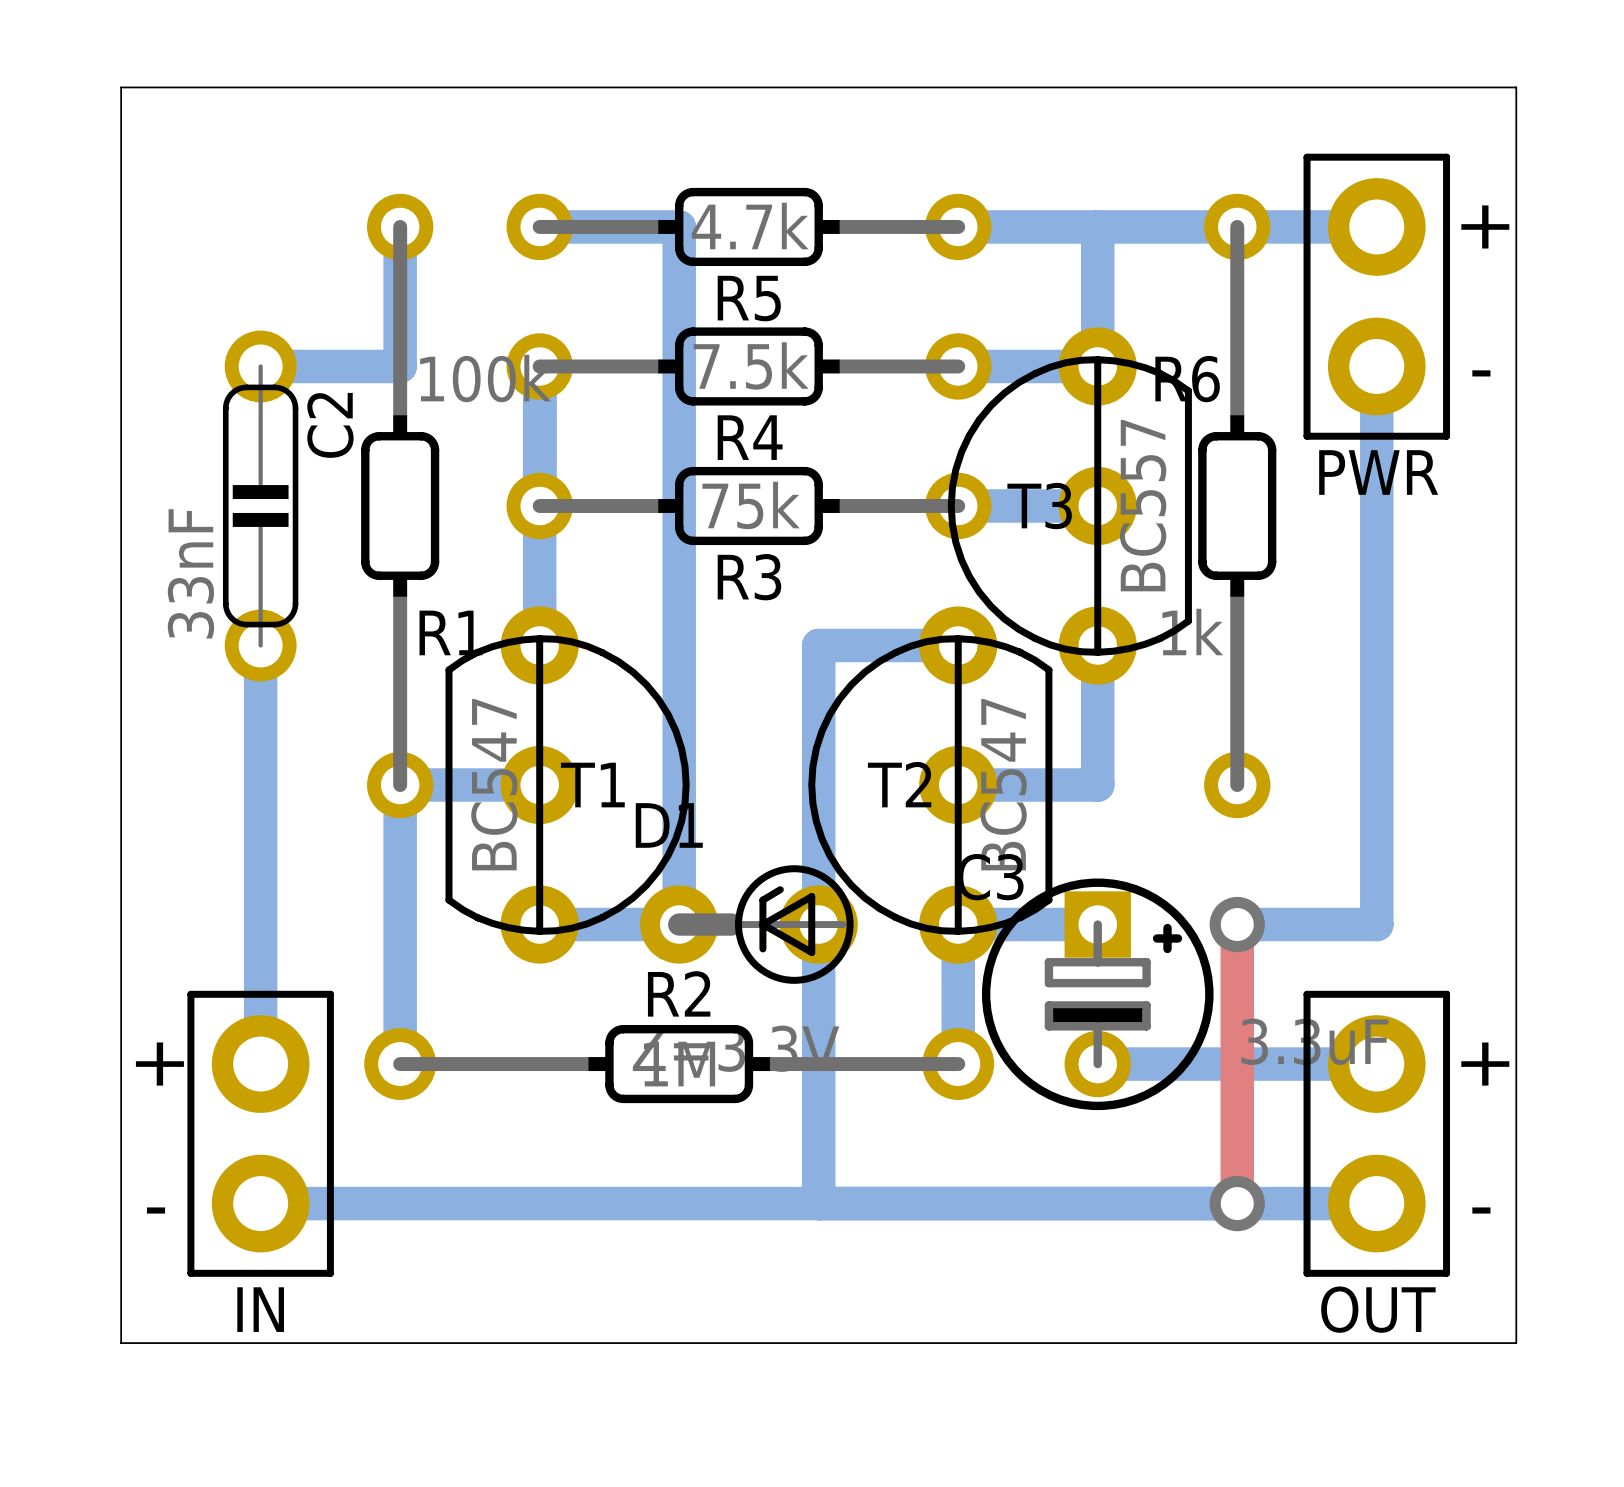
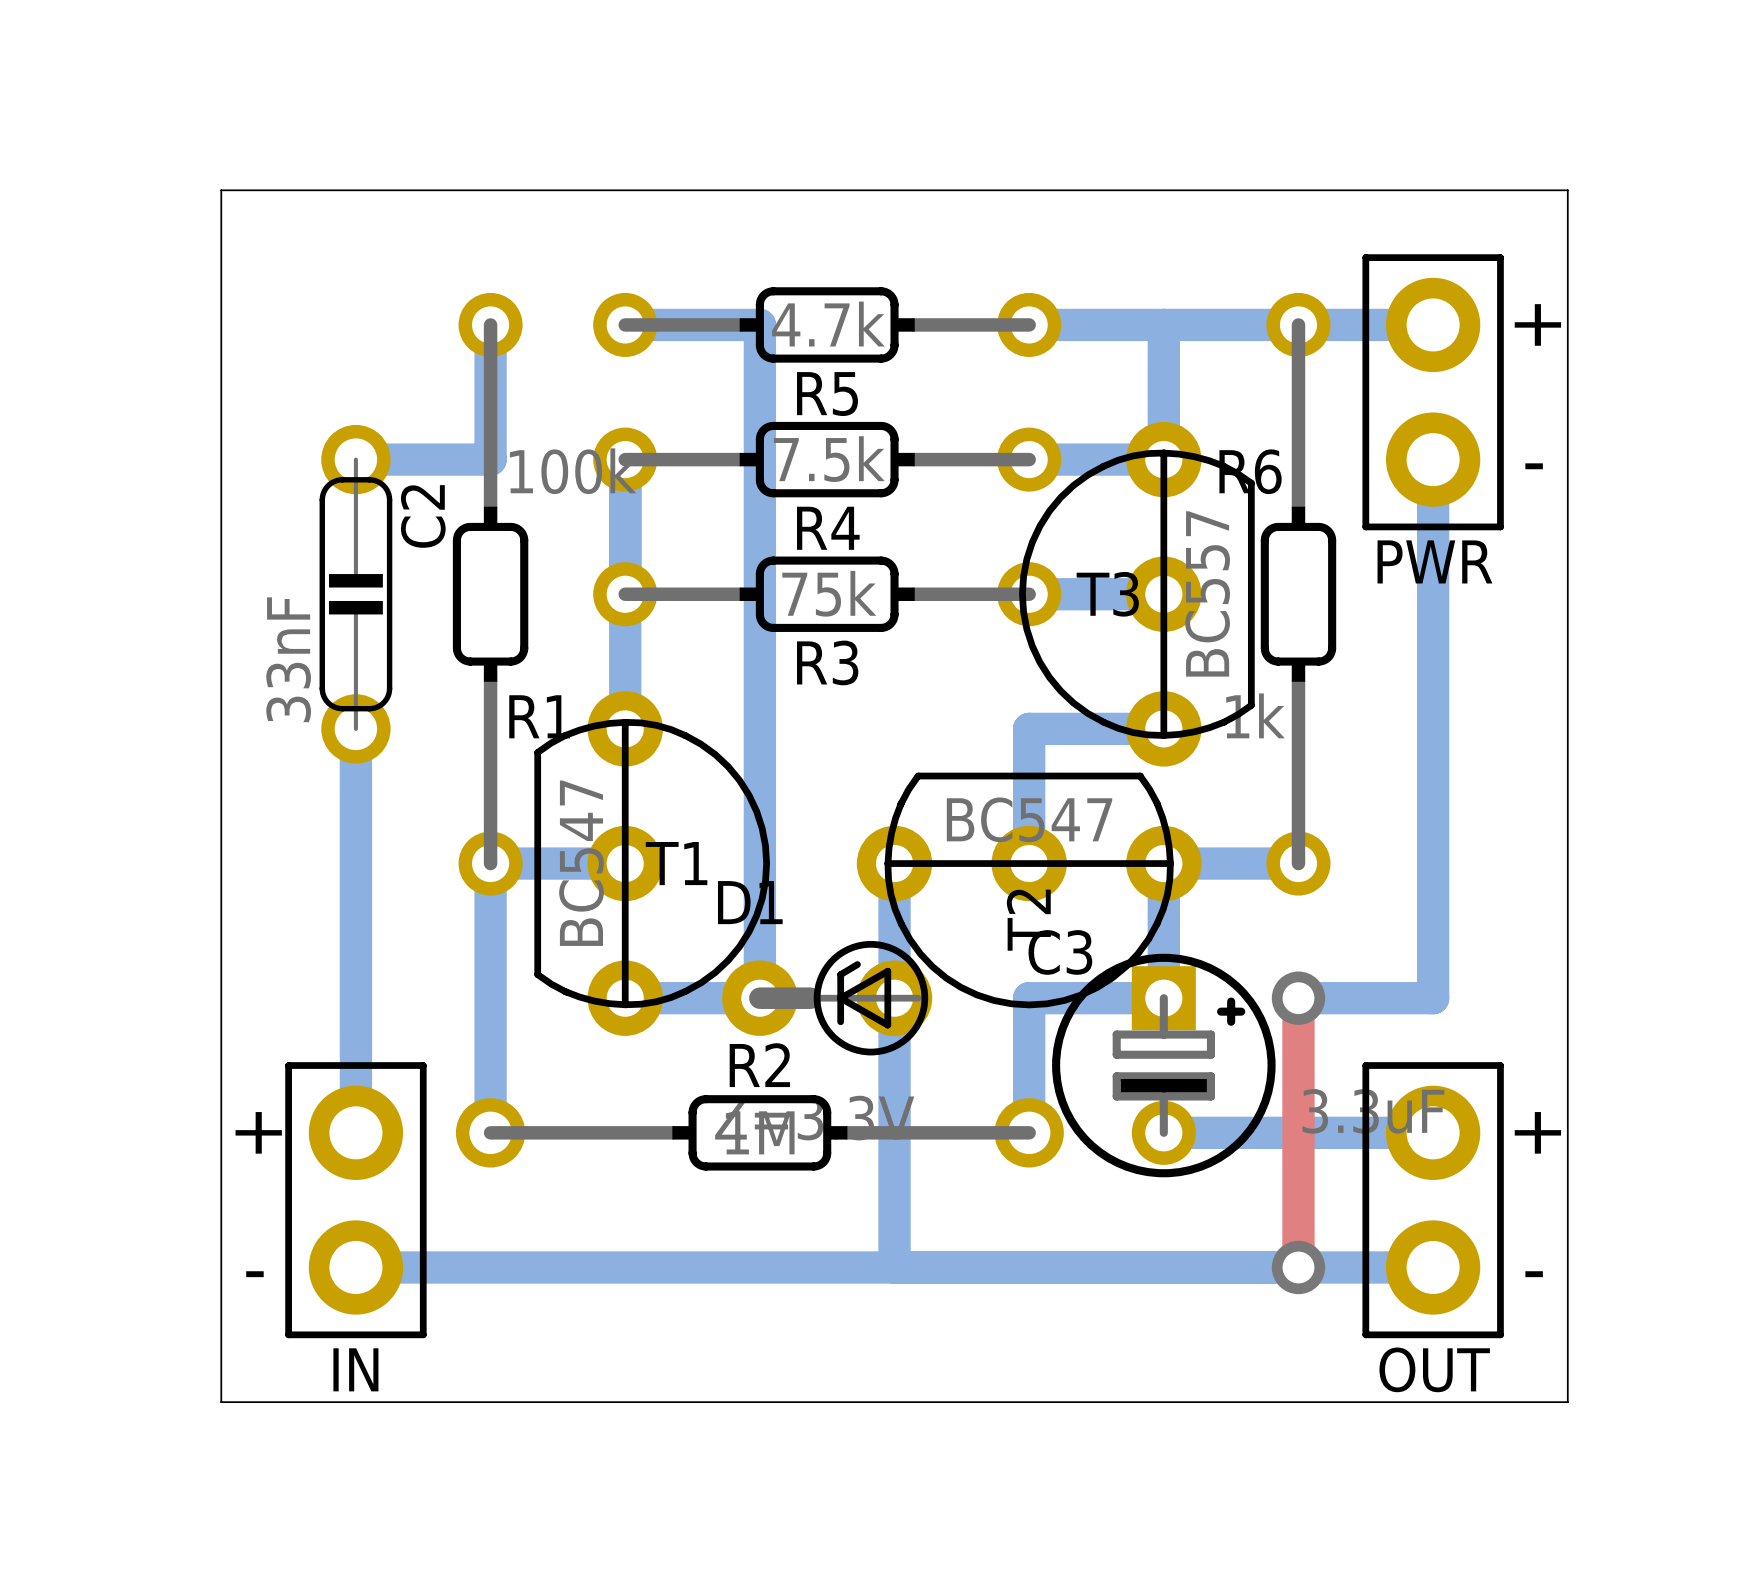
bottom track: (958, 645) (818, 645) (818, 785) -> (1298, 863) (1163, 863) (1163, 998)
bottom track: (1097, 645) (1097, 785) (958, 785) -> (1163, 728) (1029, 728) (1029, 863)
T2 rotation: 0° (930, 785) -> 90° counterclockwise (1029, 890)

